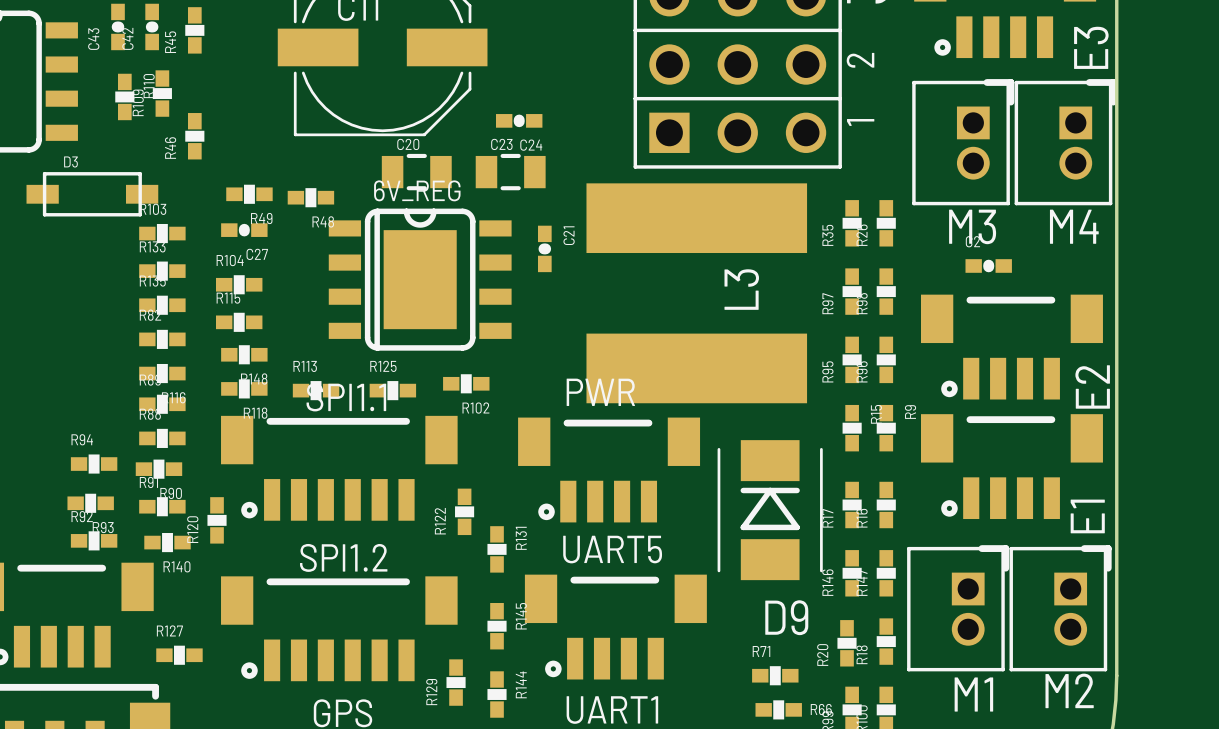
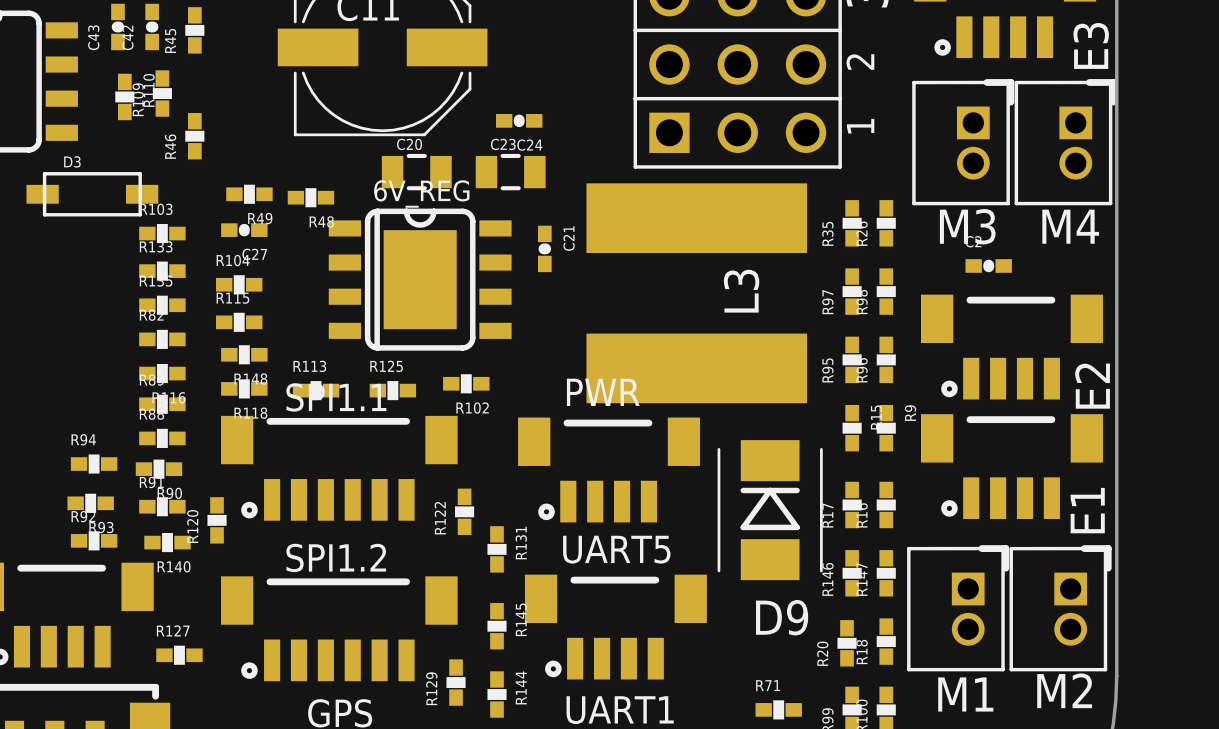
R71: (775, 675) -> none
R66 name: R66 (821, 709) -> R71 (768, 685)

